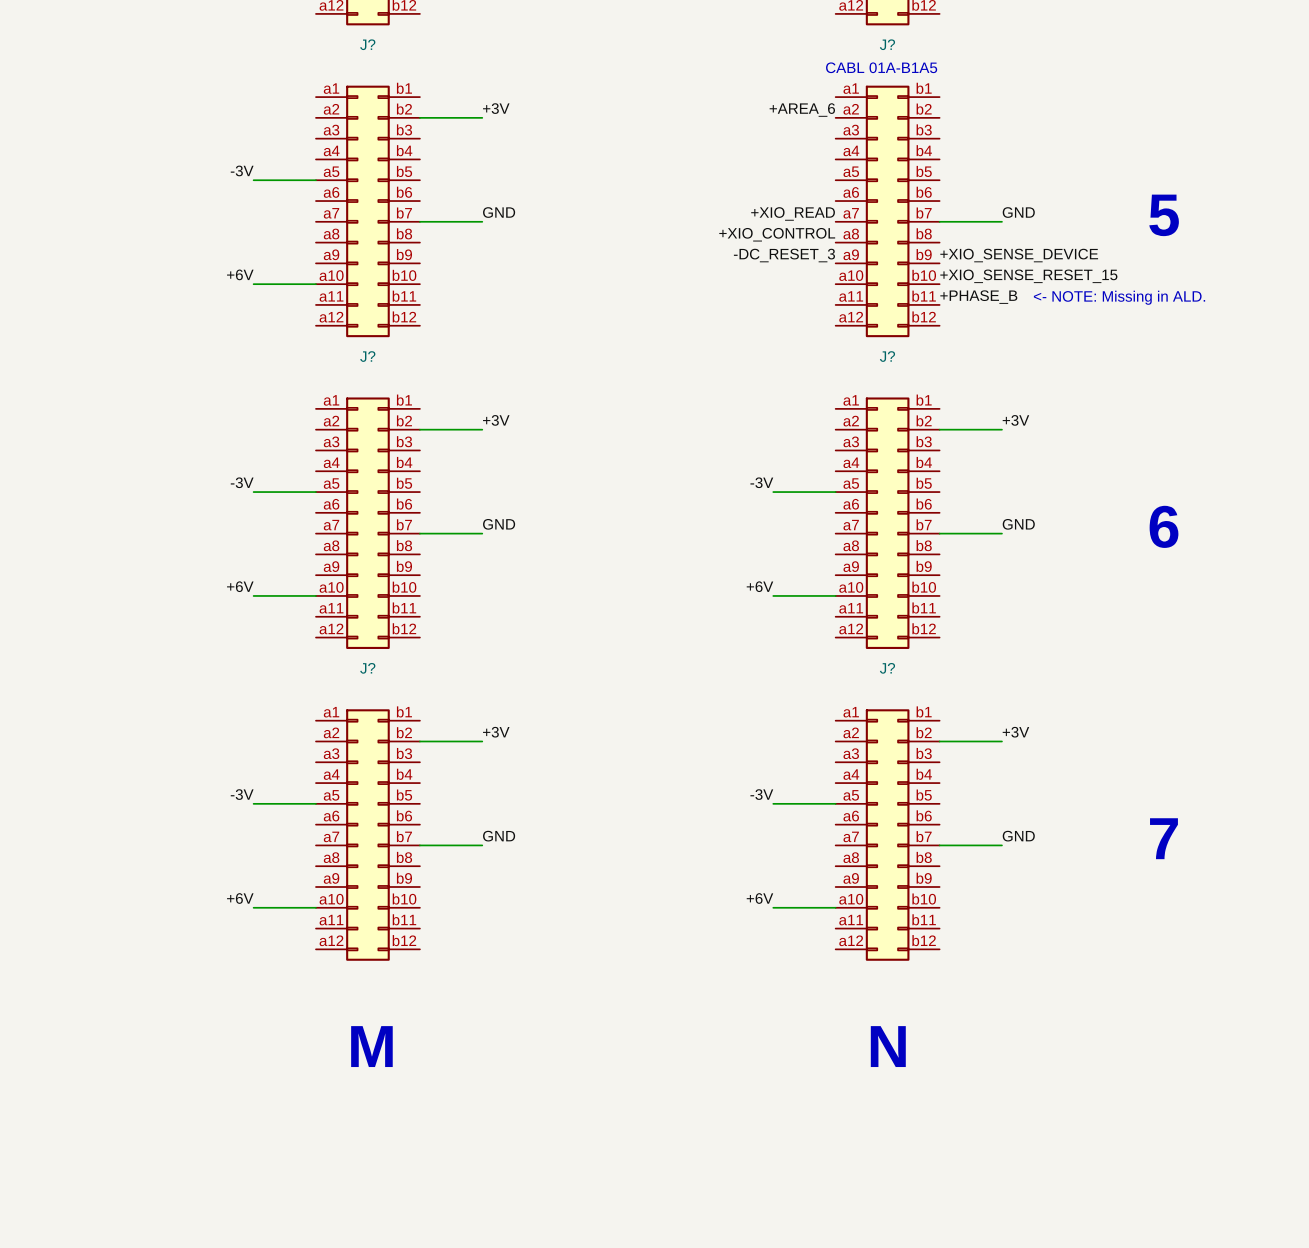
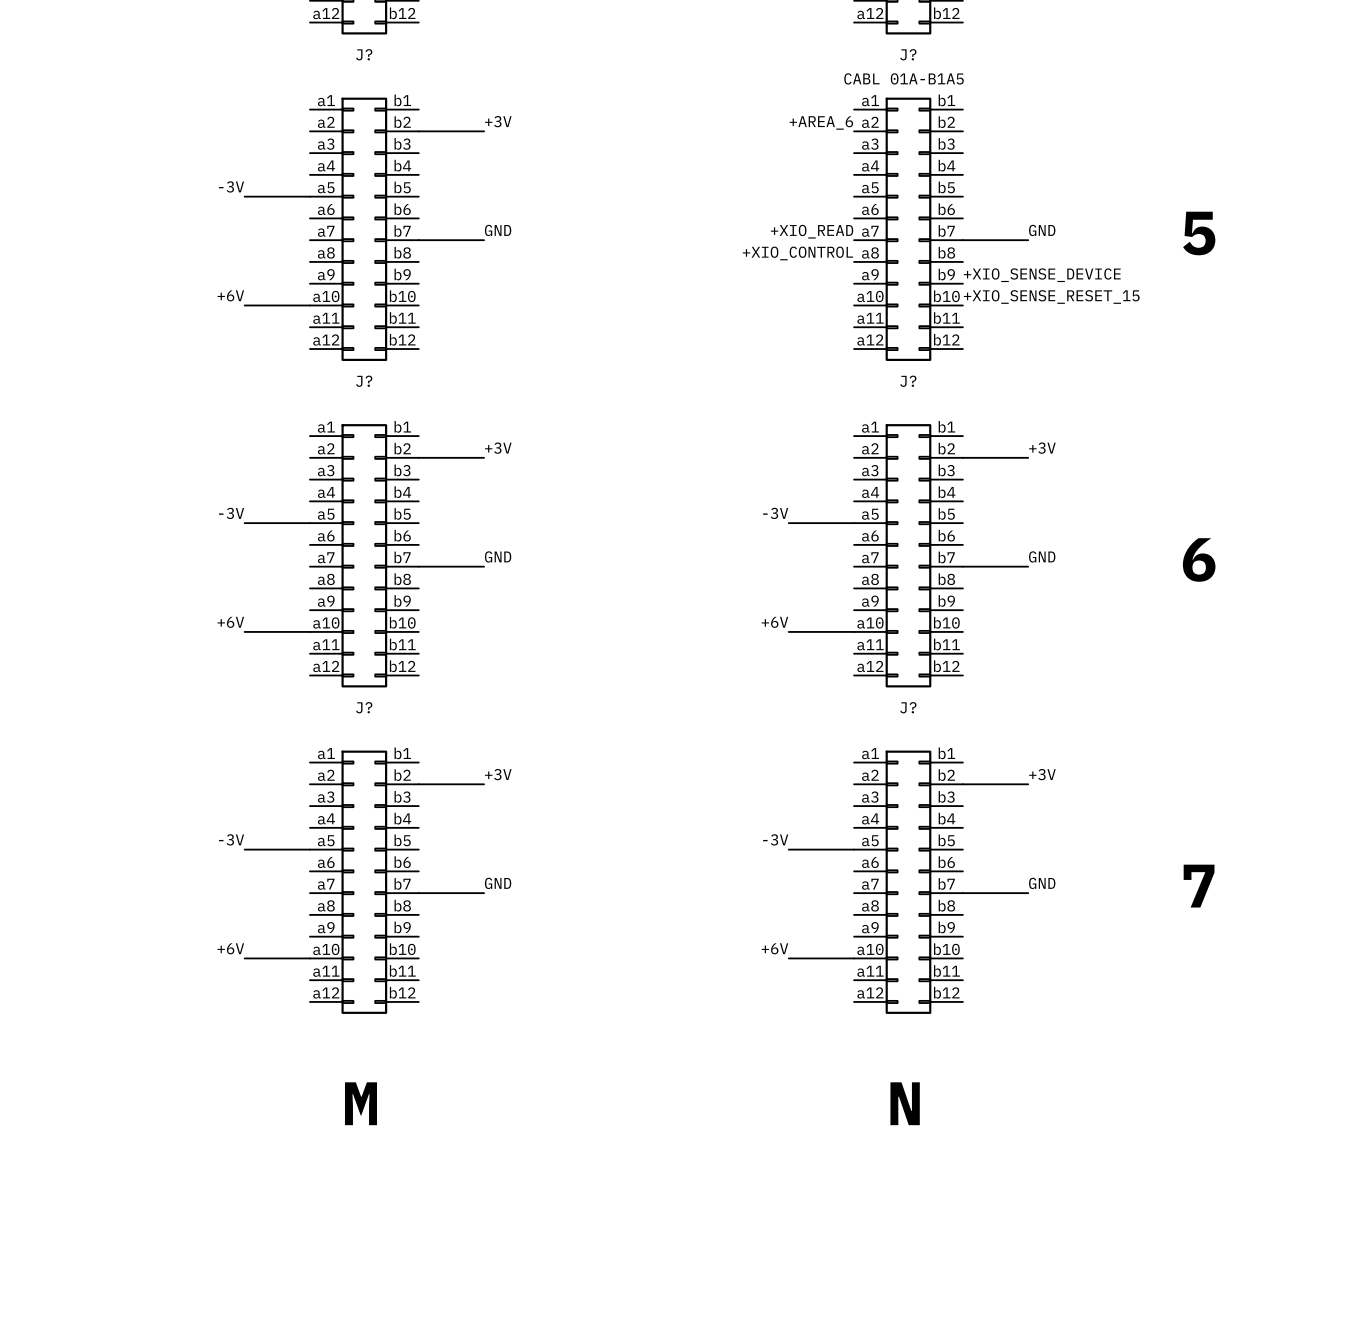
label: -DC_RESET_3 (784, 255) -> none
label: +PHASE_B (978, 297) -> none
text: <- NOTE: Missing in ALD. (1119, 297) -> none

